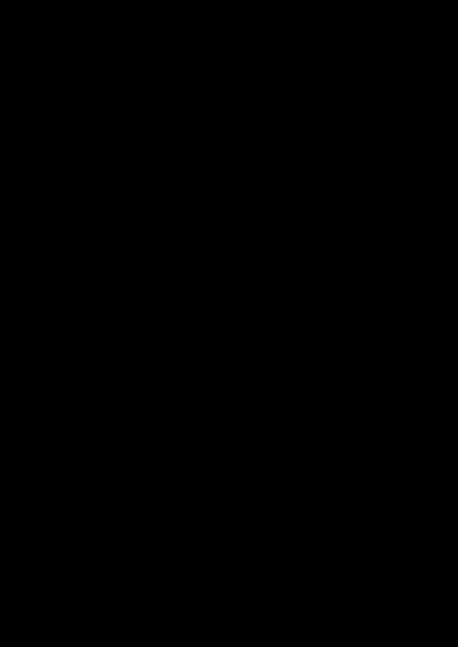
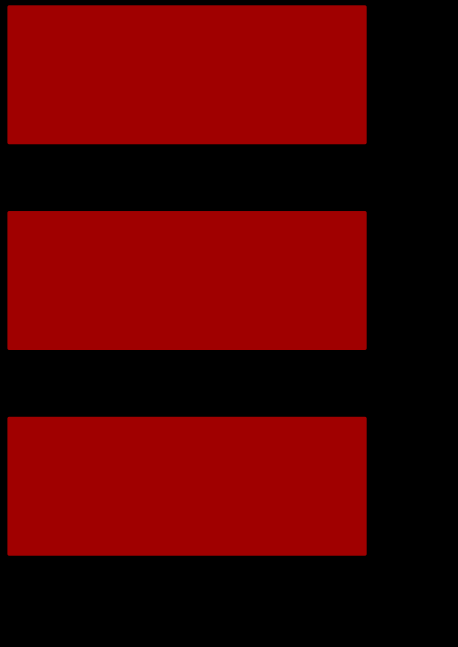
drawing: none -> [7, 5, 367, 145]
drawing: none -> [7, 211, 367, 351]
drawing: none -> [7, 416, 367, 556]

